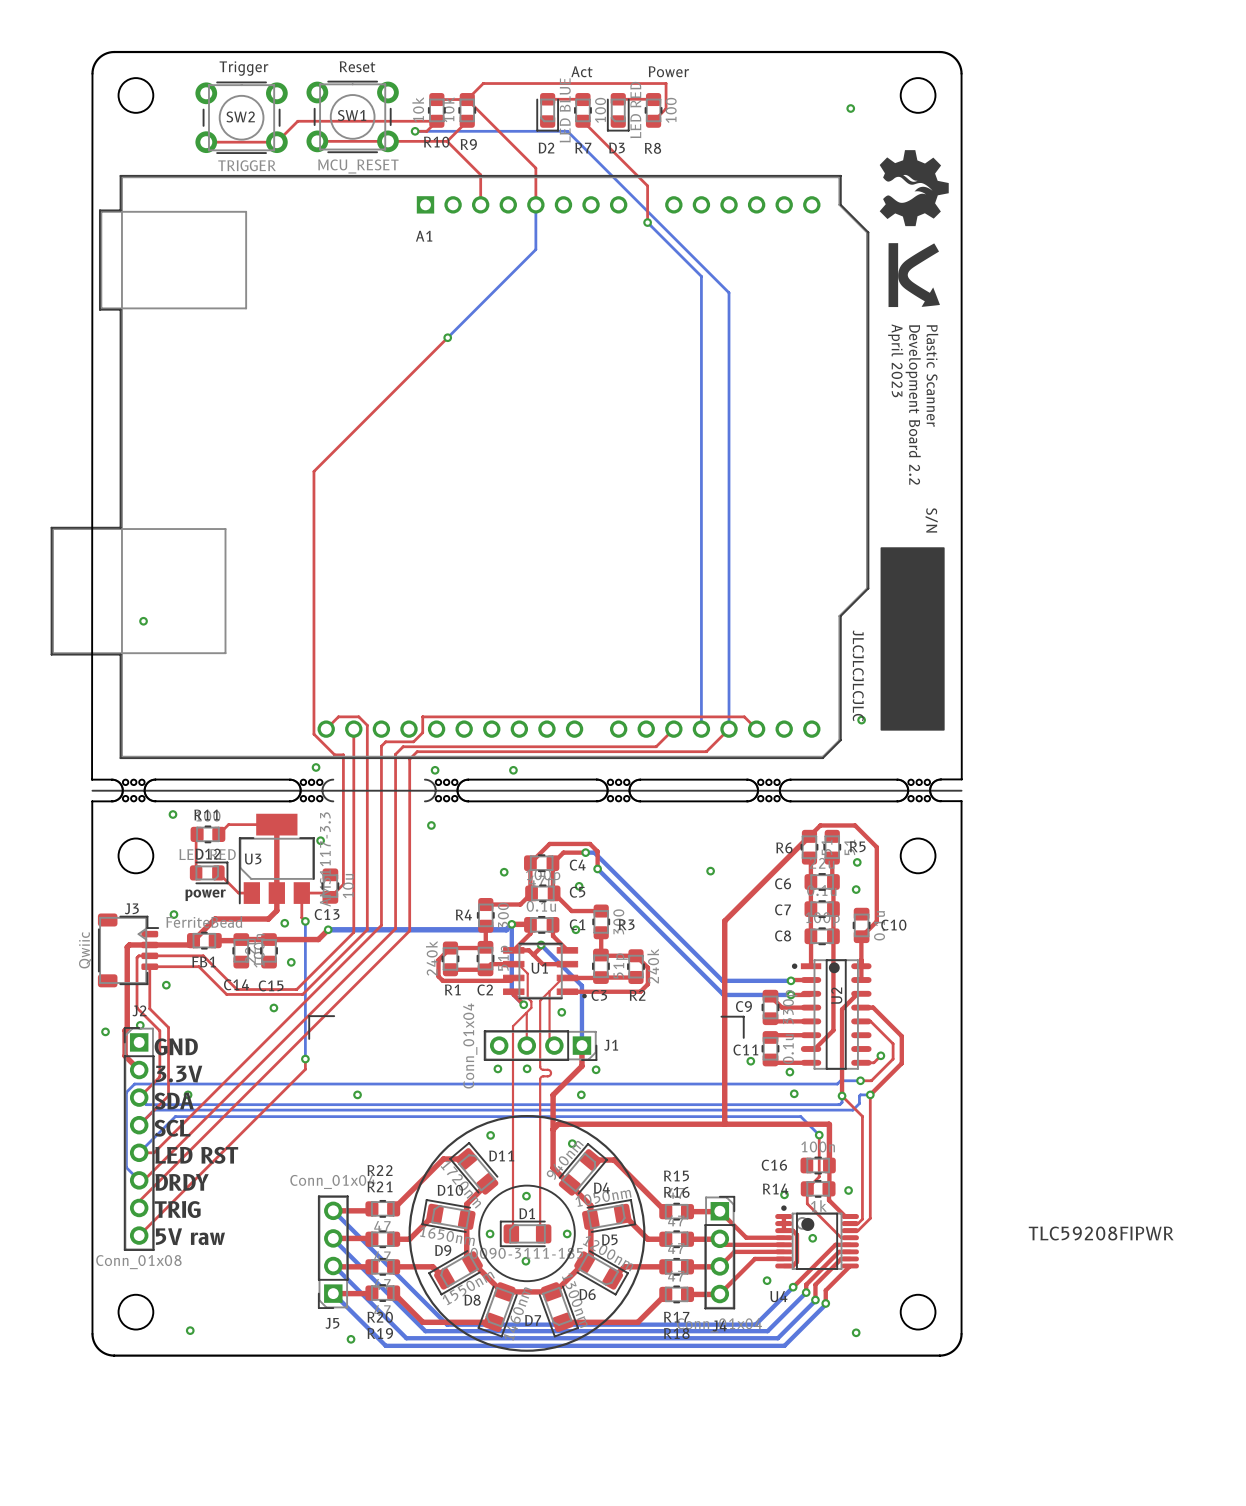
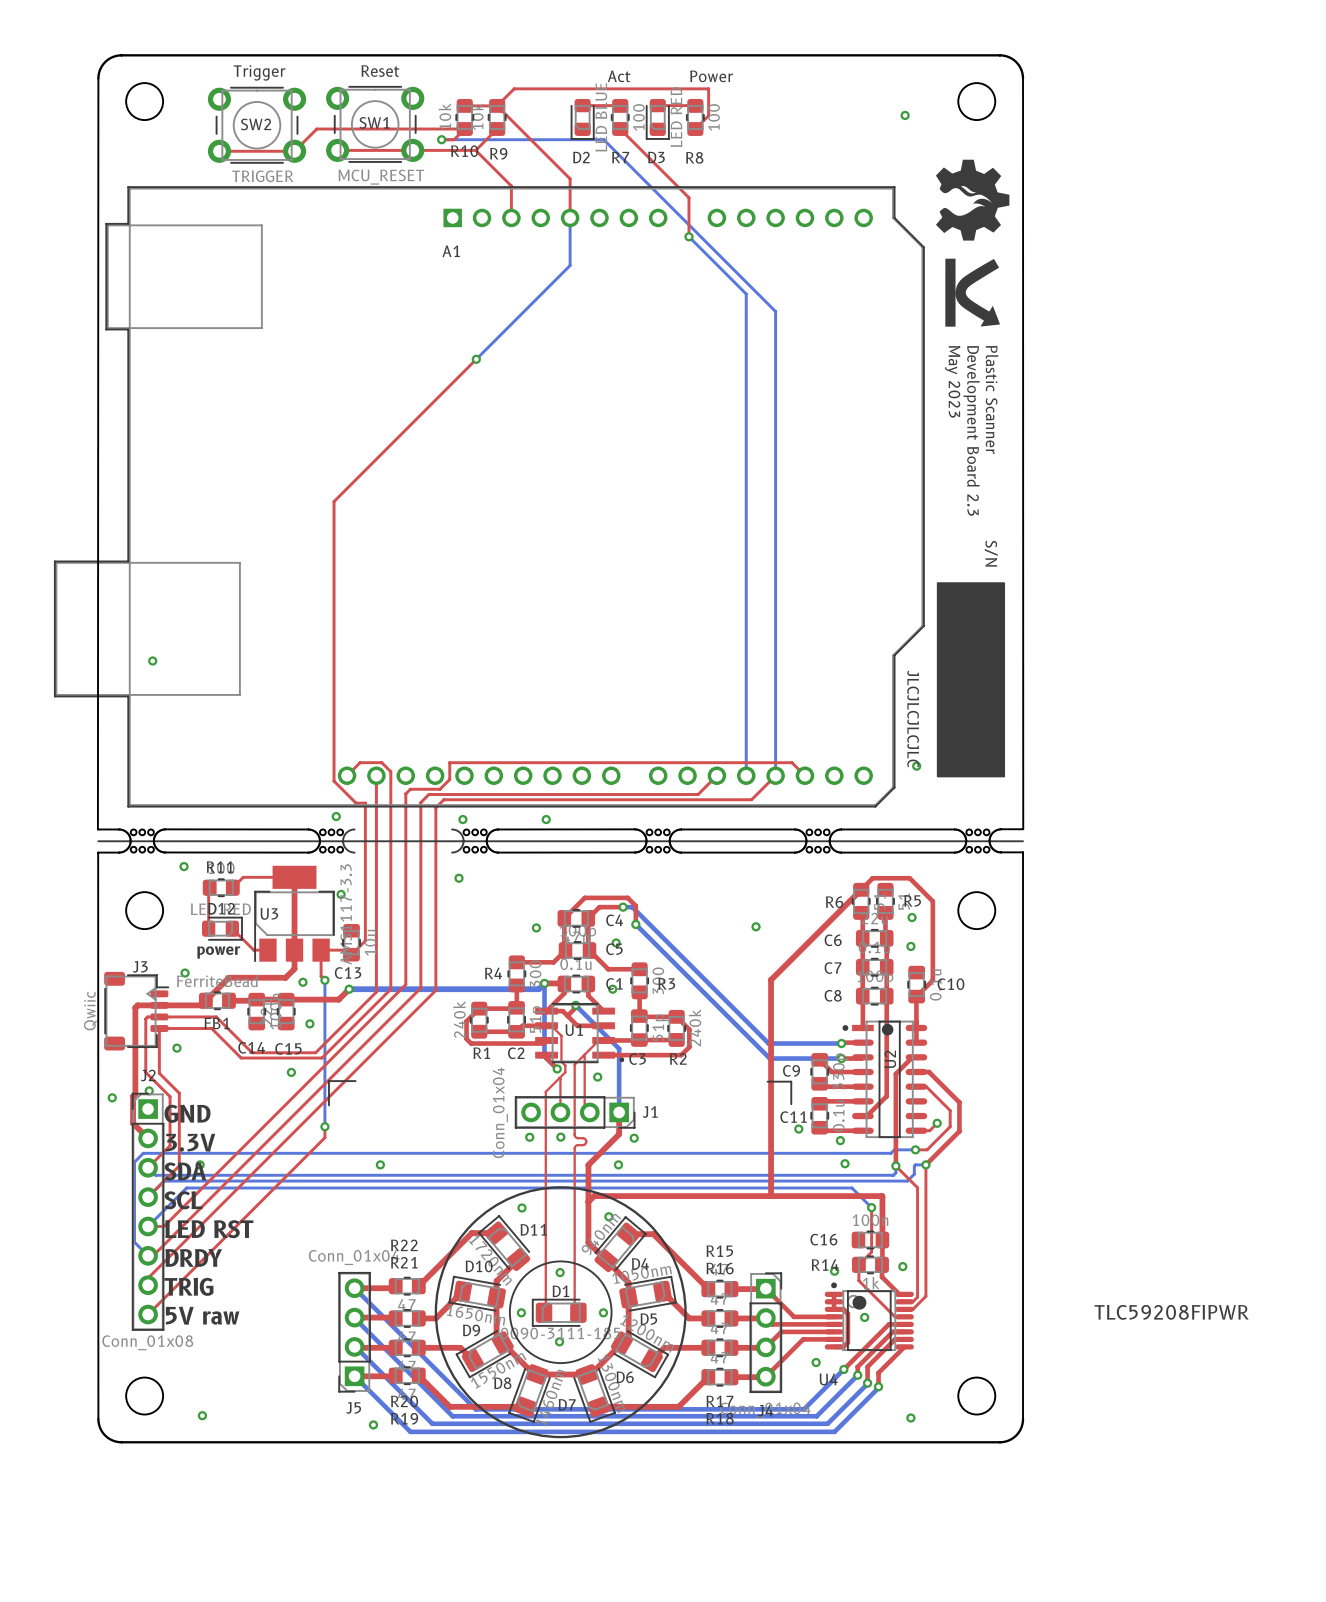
text: April 2023 (895, 360) -> May 2023 (952, 381)
text: Development Board 2.2 (913, 404) -> Development Board 2.3 (971, 430)

